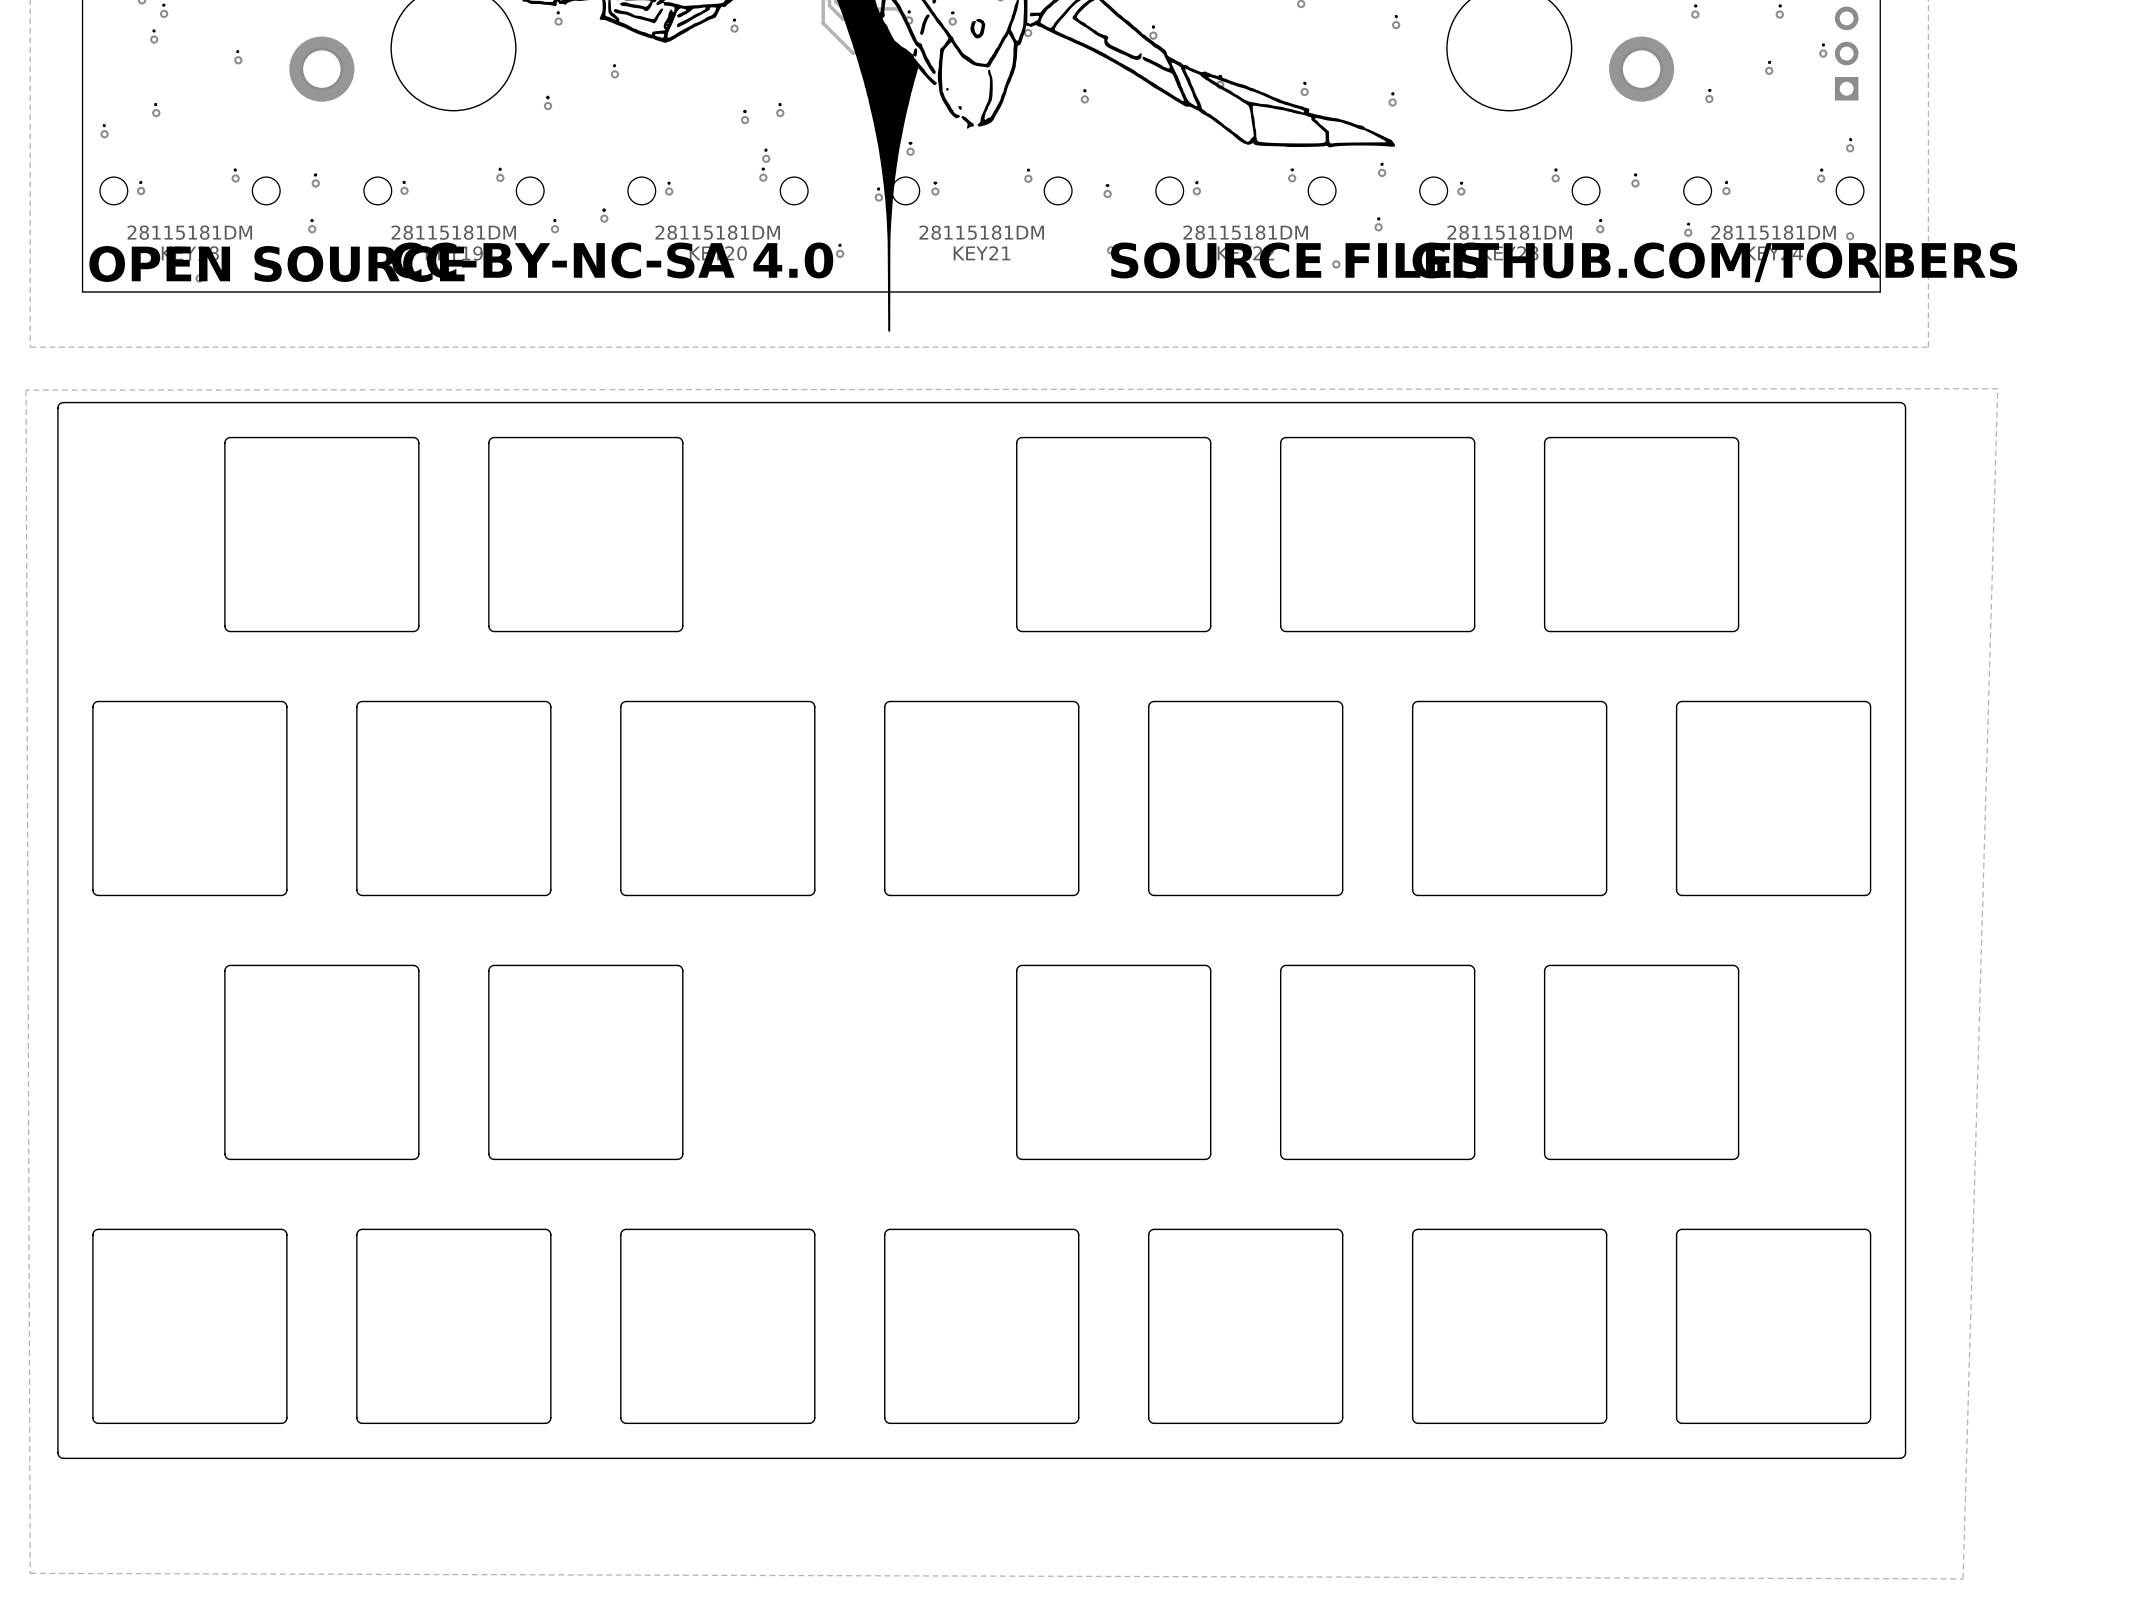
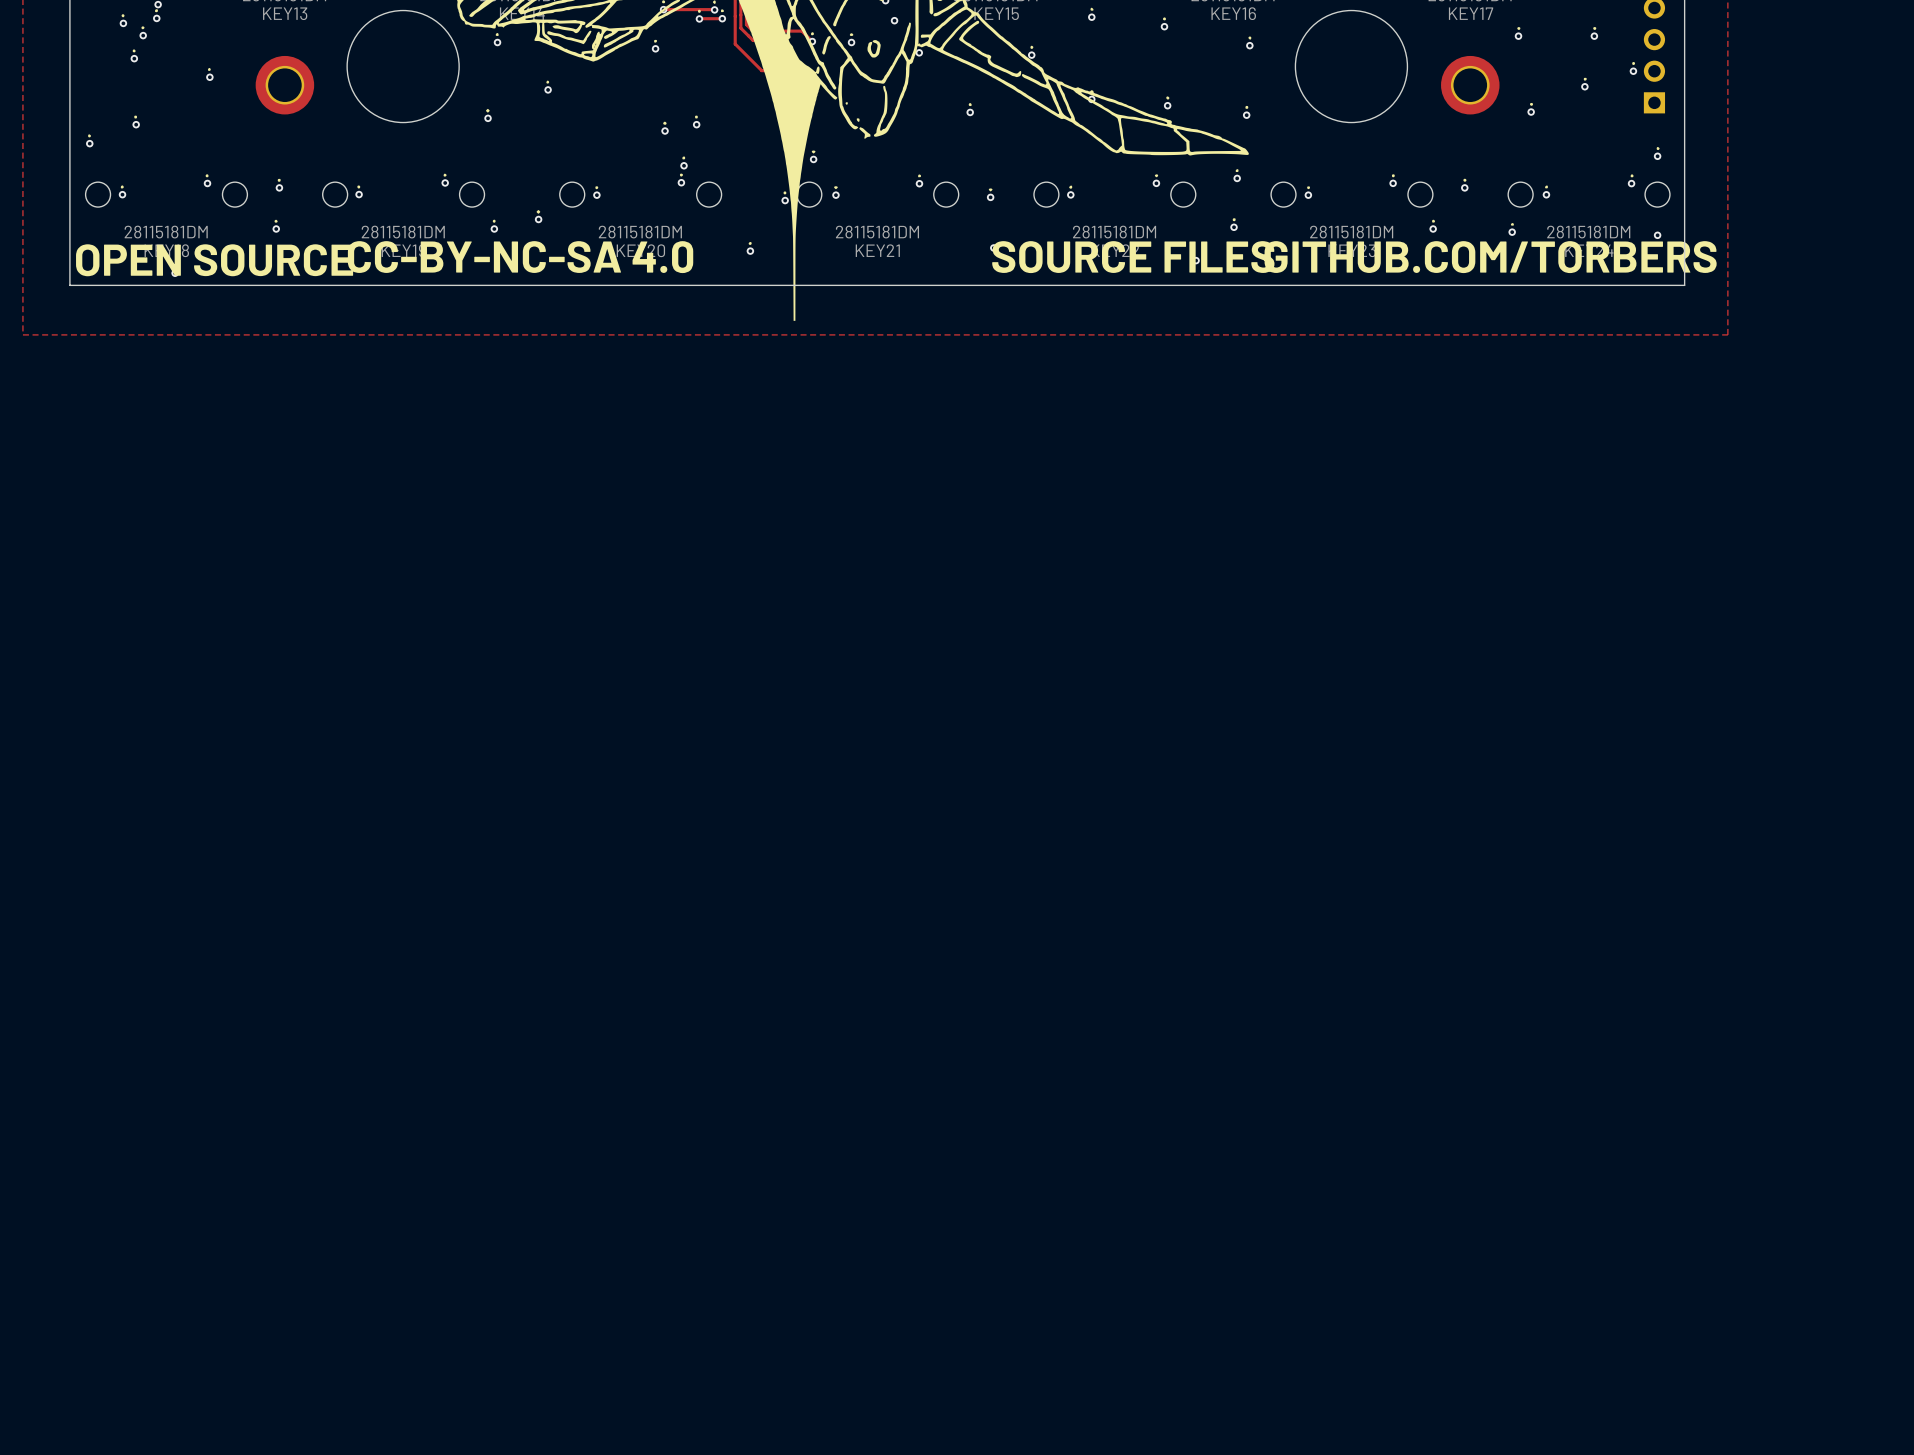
zone outline: (1997, 388) (26, 390) (30, 1573) (1963, 1578) (1997, 388) -> none
board edge: (63, 402) (1902, 403) (1905, 408) (1904, 1455) (1900, 1458) (60, 1457) (57, 1452) (57, 408) (59, 404) (63, 402) -> none
board edge: (230, 437) (413, 437) (417, 439) (418, 443) (418, 625) (417, 629) (413, 631) (230, 631) (226, 629) (224, 625) (224, 443) (226, 439) (230, 437) -> none
board edge: (494, 437) (677, 437) (681, 439) (682, 443) (682, 625) (681, 629) (677, 631) (494, 631) (490, 629) (488, 625) (488, 443) (490, 439) (494, 437) -> none
board edge: (1022, 437) (1205, 437) (1209, 439) (1210, 443) (1210, 625) (1209, 629) (1205, 631) (1022, 631) (1018, 629) (1016, 625) (1016, 443) (1018, 439) (1022, 437) -> none
board edge: (1286, 437) (1469, 437) (1473, 439) (1474, 443) (1474, 625) (1473, 629) (1469, 631) (1286, 631) (1282, 629) (1280, 625) (1280, 443) (1282, 439) (1286, 437) -> none
board edge: (1550, 437) (1733, 437) (1736, 439) (1738, 443) (1738, 625) (1736, 629) (1733, 631) (1550, 631) (1546, 629) (1544, 625) (1544, 443) (1546, 439) (1550, 437) -> none
board edge: (98, 701) (281, 701) (285, 703) (286, 707) (286, 889) (285, 893) (281, 895) (98, 895) (94, 893) (92, 889) (92, 707) (94, 703) (98, 701) -> none
board edge: (362, 701) (545, 701) (549, 703) (550, 707) (550, 889) (549, 893) (545, 895) (362, 895) (358, 893) (356, 889) (356, 707) (358, 703) (362, 701) -> none
board edge: (626, 701) (809, 701) (813, 703) (814, 707) (814, 889) (813, 893) (809, 895) (626, 895) (622, 893) (620, 889) (620, 707) (622, 703) (626, 701) -> none
board edge: (890, 701) (1073, 701) (1077, 703) (1078, 707) (1078, 889) (1077, 893) (1073, 895) (890, 895) (886, 893) (884, 889) (884, 707) (886, 703) (890, 701) -> none
board edge: (1154, 701) (1337, 701) (1341, 703) (1342, 707) (1342, 889) (1341, 893) (1337, 895) (1154, 895) (1150, 893) (1148, 889) (1148, 707) (1150, 703) (1154, 701) -> none
board edge: (1418, 701) (1601, 701) (1604, 703) (1606, 707) (1606, 889) (1604, 893) (1601, 895) (1418, 895) (1414, 893) (1412, 889) (1412, 707) (1414, 703) (1418, 701) -> none
board edge: (1682, 701) (1865, 701) (1868, 703) (1870, 707) (1870, 889) (1868, 893) (1865, 895) (1682, 895) (1678, 893) (1676, 889) (1676, 707) (1678, 703) (1682, 701) -> none
board edge: (230, 965) (413, 965) (417, 967) (418, 970) (418, 1153) (417, 1157) (413, 1159) (230, 1159) (226, 1157) (224, 1153) (224, 970) (226, 967) (230, 965) -> none
board edge: (494, 965) (677, 965) (681, 967) (682, 970) (682, 1153) (681, 1157) (677, 1159) (494, 1159) (490, 1157) (488, 1153) (488, 970) (490, 967) (494, 965) -> none
board edge: (1022, 965) (1205, 965) (1209, 967) (1210, 970) (1210, 1153) (1209, 1157) (1205, 1159) (1022, 1159) (1018, 1157) (1016, 1153) (1016, 970) (1018, 967) (1022, 965) -> none
board edge: (1286, 965) (1469, 965) (1473, 967) (1474, 970) (1474, 1153) (1473, 1157) (1469, 1159) (1286, 1159) (1282, 1157) (1280, 1153) (1280, 970) (1282, 967) (1286, 965) -> none
board edge: (1550, 965) (1733, 965) (1736, 967) (1738, 970) (1738, 1153) (1736, 1157) (1733, 1159) (1550, 1159) (1546, 1157) (1544, 1153) (1544, 970) (1546, 967) (1550, 965) -> none
board edge: (98, 1229) (281, 1229) (285, 1231) (286, 1234) (286, 1417) (285, 1421) (281, 1423) (98, 1423) (94, 1421) (92, 1417) (92, 1234) (94, 1231) (98, 1229) -> none
board edge: (362, 1229) (545, 1229) (549, 1231) (550, 1234) (550, 1417) (549, 1421) (545, 1423) (362, 1423) (358, 1421) (356, 1417) (356, 1234) (358, 1231) (362, 1229) -> none
board edge: (626, 1229) (809, 1229) (813, 1231) (814, 1234) (814, 1417) (813, 1421) (809, 1423) (626, 1423) (622, 1421) (620, 1417) (620, 1234) (622, 1231) (626, 1229) -> none
board edge: (890, 1229) (1073, 1229) (1077, 1231) (1078, 1234) (1078, 1417) (1077, 1421) (1073, 1423) (890, 1423) (886, 1421) (884, 1417) (884, 1234) (886, 1231) (890, 1229) -> none
board edge: (1154, 1229) (1337, 1229) (1341, 1231) (1342, 1234) (1342, 1417) (1341, 1421) (1337, 1423) (1154, 1423) (1150, 1421) (1148, 1417) (1148, 1234) (1150, 1231) (1154, 1229) -> none
board edge: (1418, 1229) (1601, 1229) (1604, 1231) (1606, 1234) (1606, 1417) (1604, 1421) (1601, 1423) (1418, 1423) (1414, 1421) (1412, 1417) (1412, 1234) (1414, 1231) (1418, 1229) -> none
board edge: (1682, 1229) (1865, 1229) (1868, 1231) (1870, 1234) (1870, 1417) (1868, 1421) (1865, 1423) (1682, 1423) (1678, 1421) (1676, 1417) (1676, 1234) (1678, 1231) (1682, 1229) -> none

